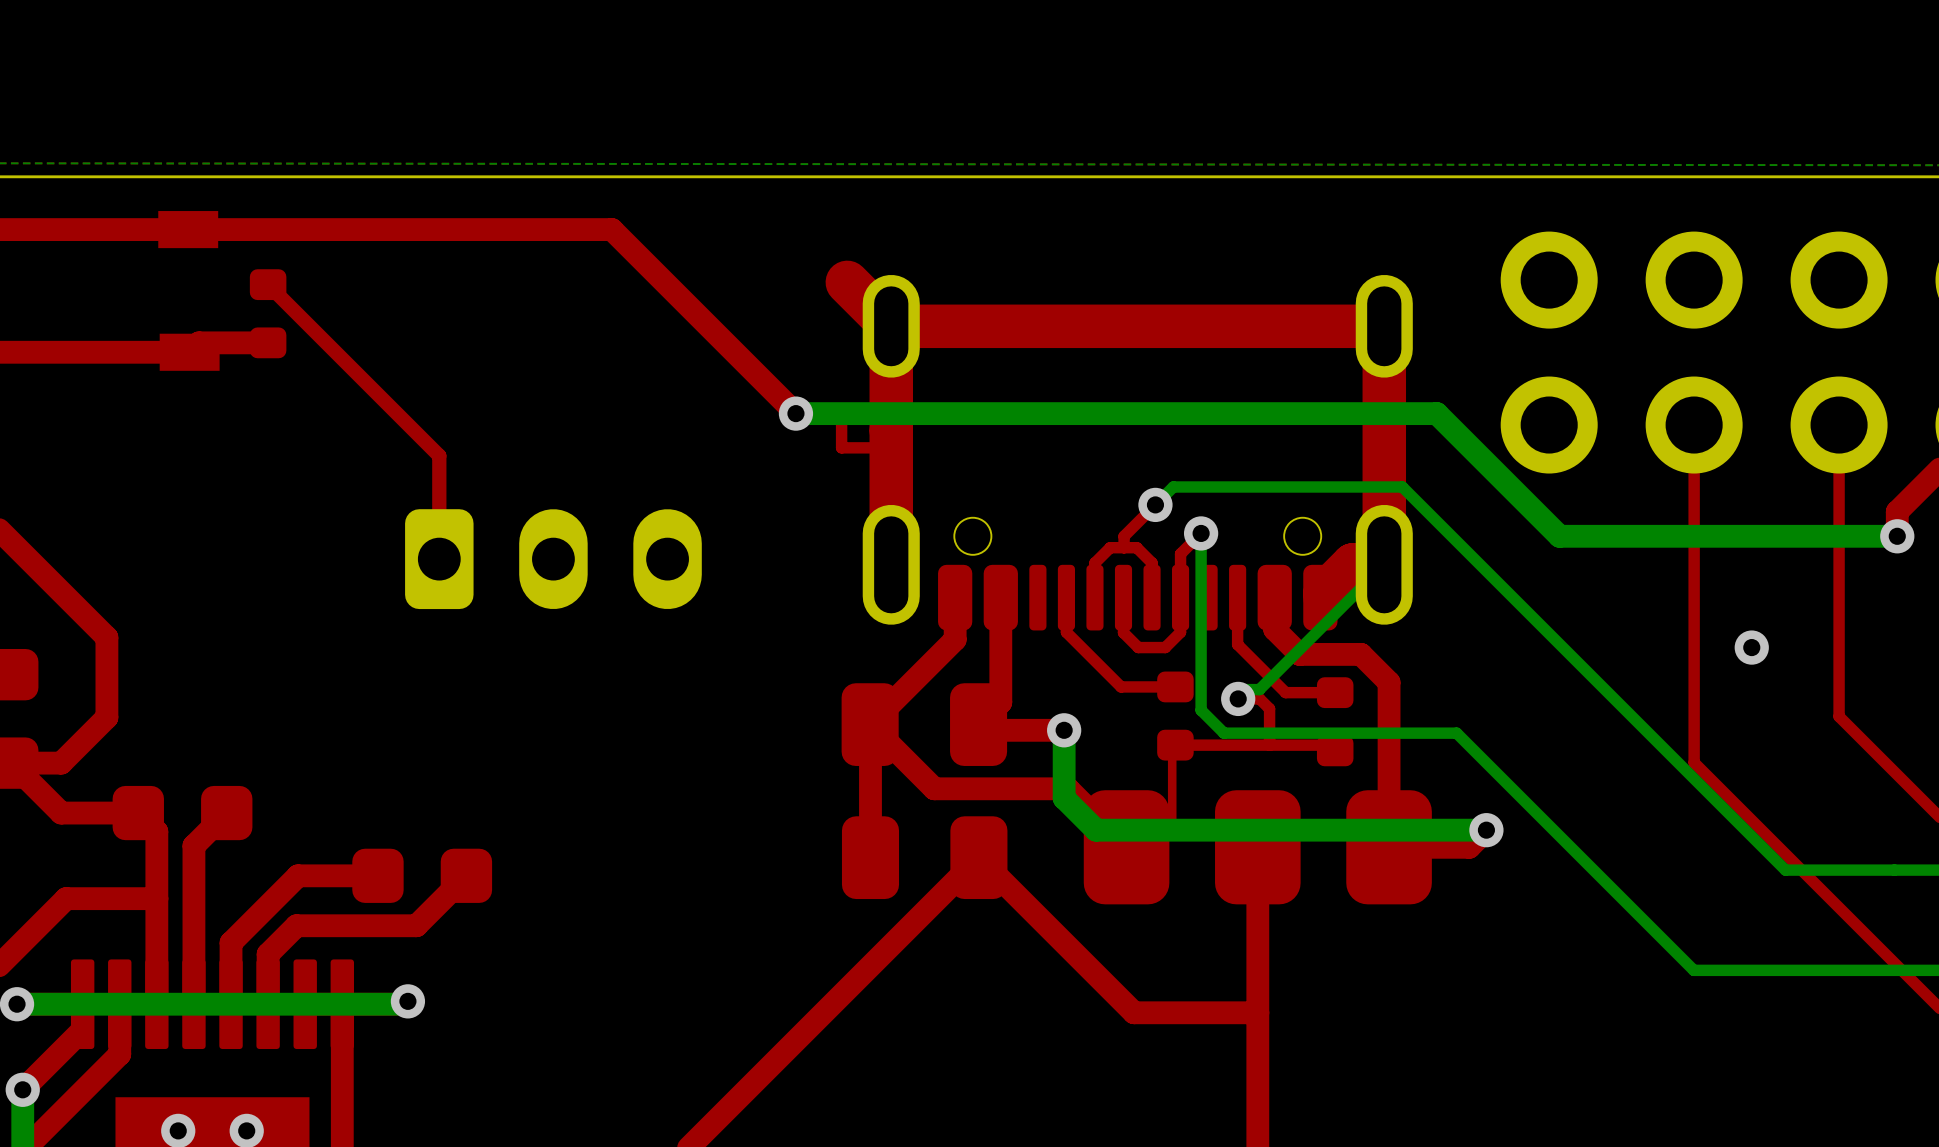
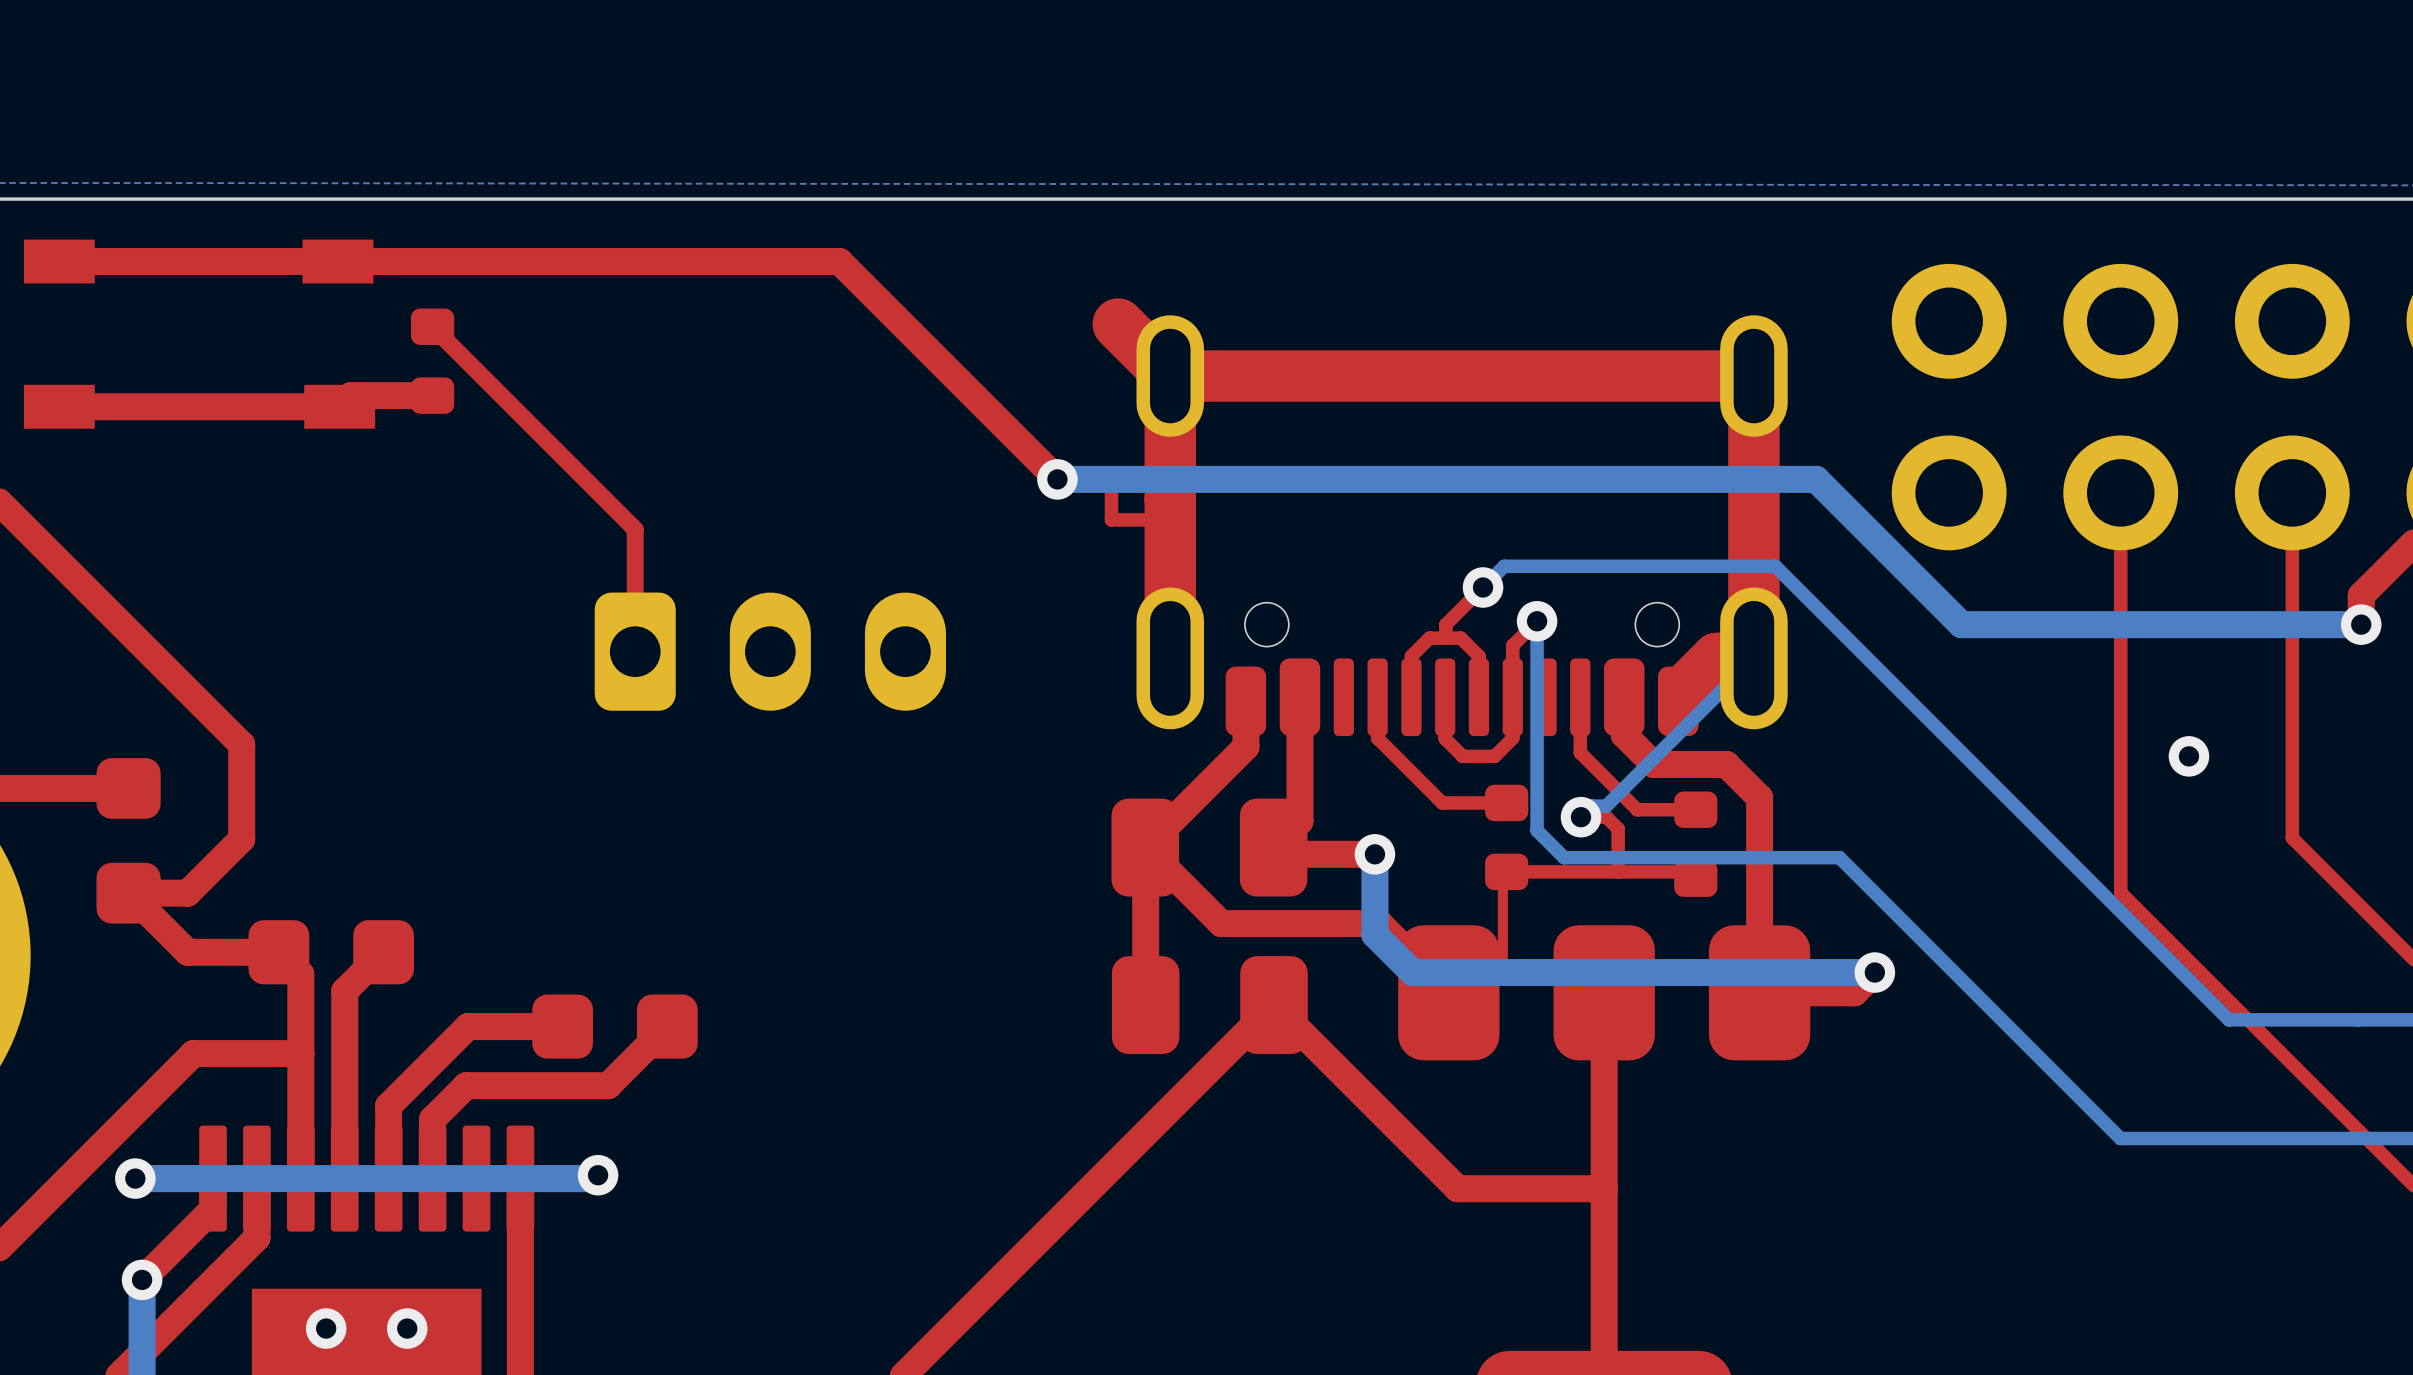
part footprint: [862, 274, 1413, 631] -> [1136, 315, 1788, 737]

